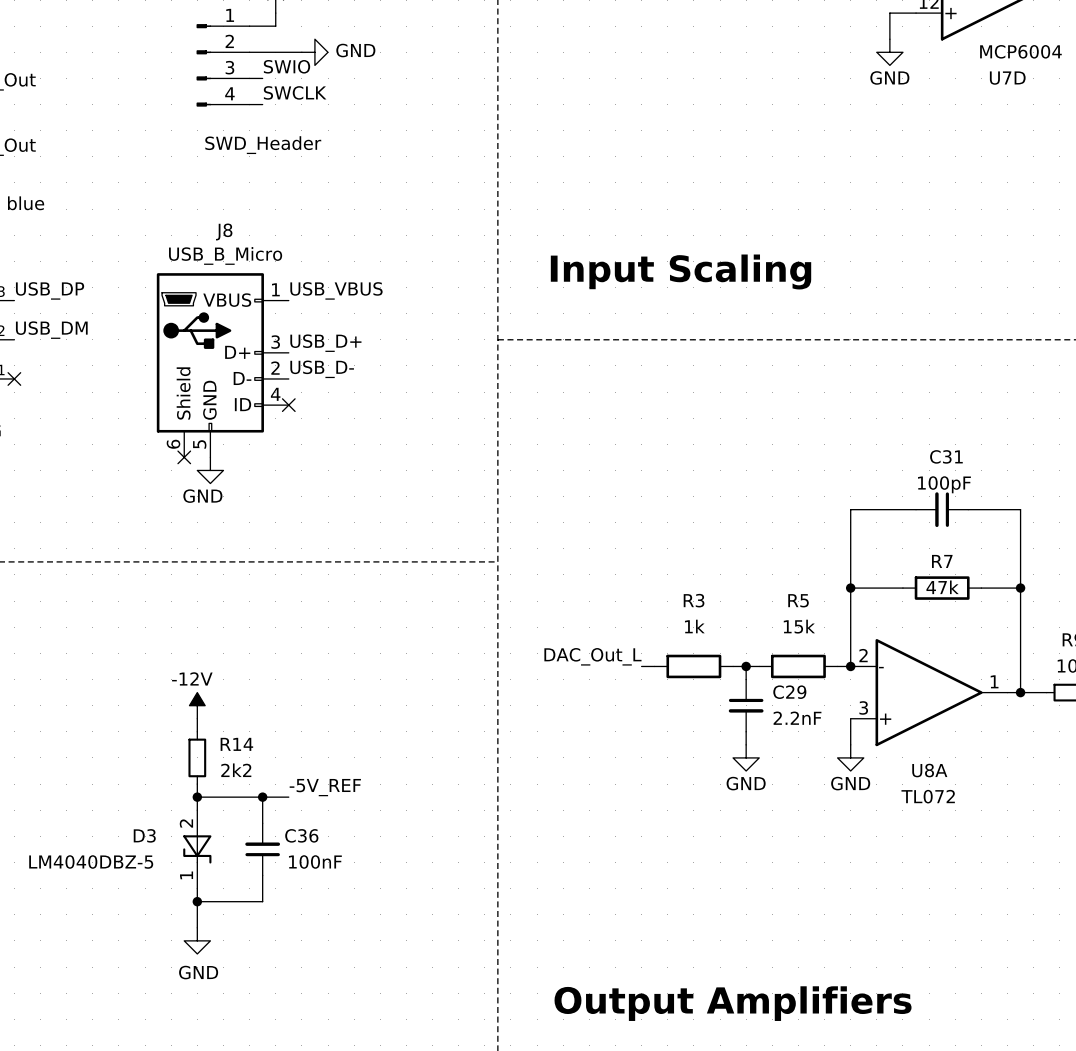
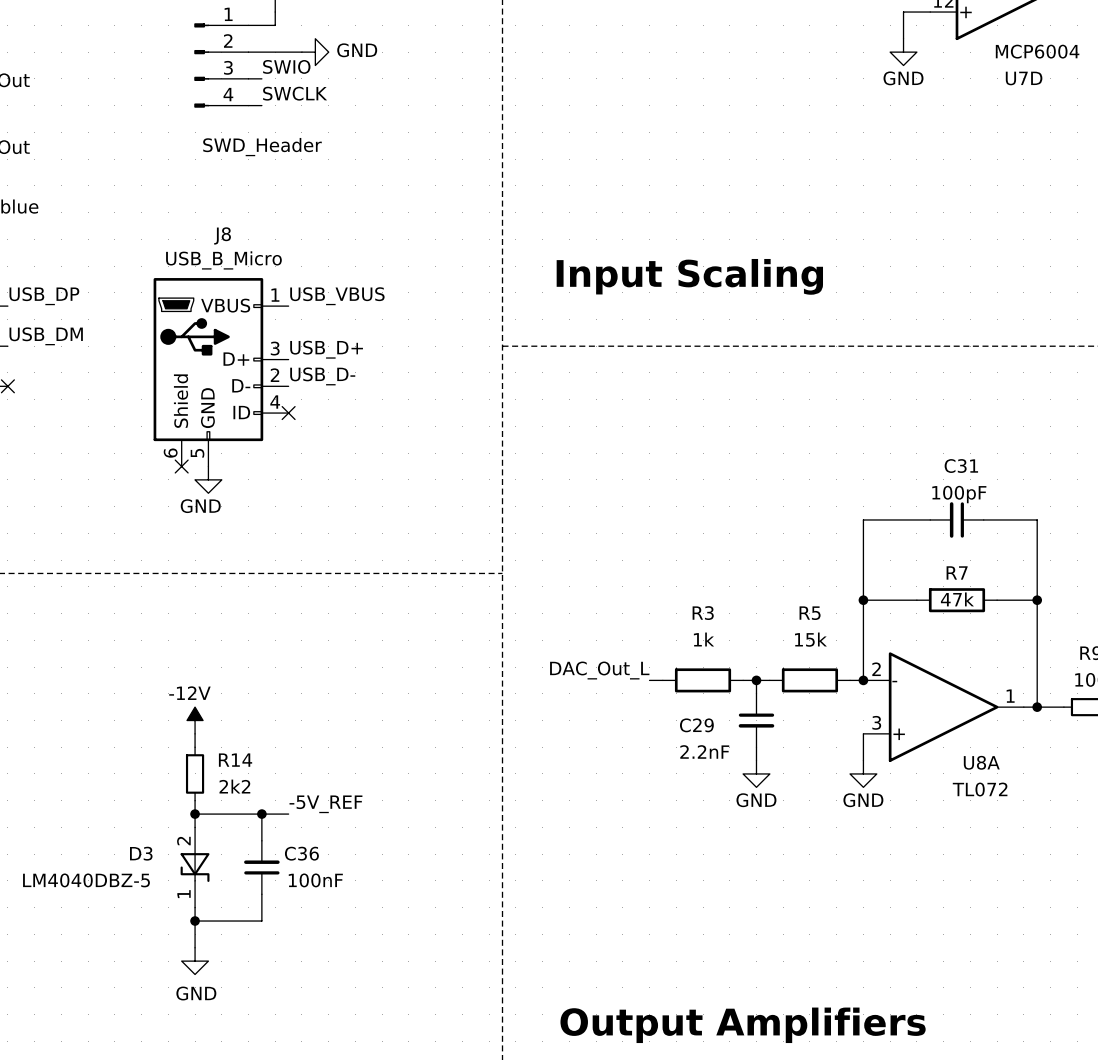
C29 name position: C29 (789, 692) -> C29 (696, 725)
C29 value position: 2.2nF (797, 718) -> 2.2nF (704, 751)
U8A name position: U8A (929, 770) -> U8A (981, 762)
U8A value position: TL072 (928, 796) -> TL072 (980, 789)

